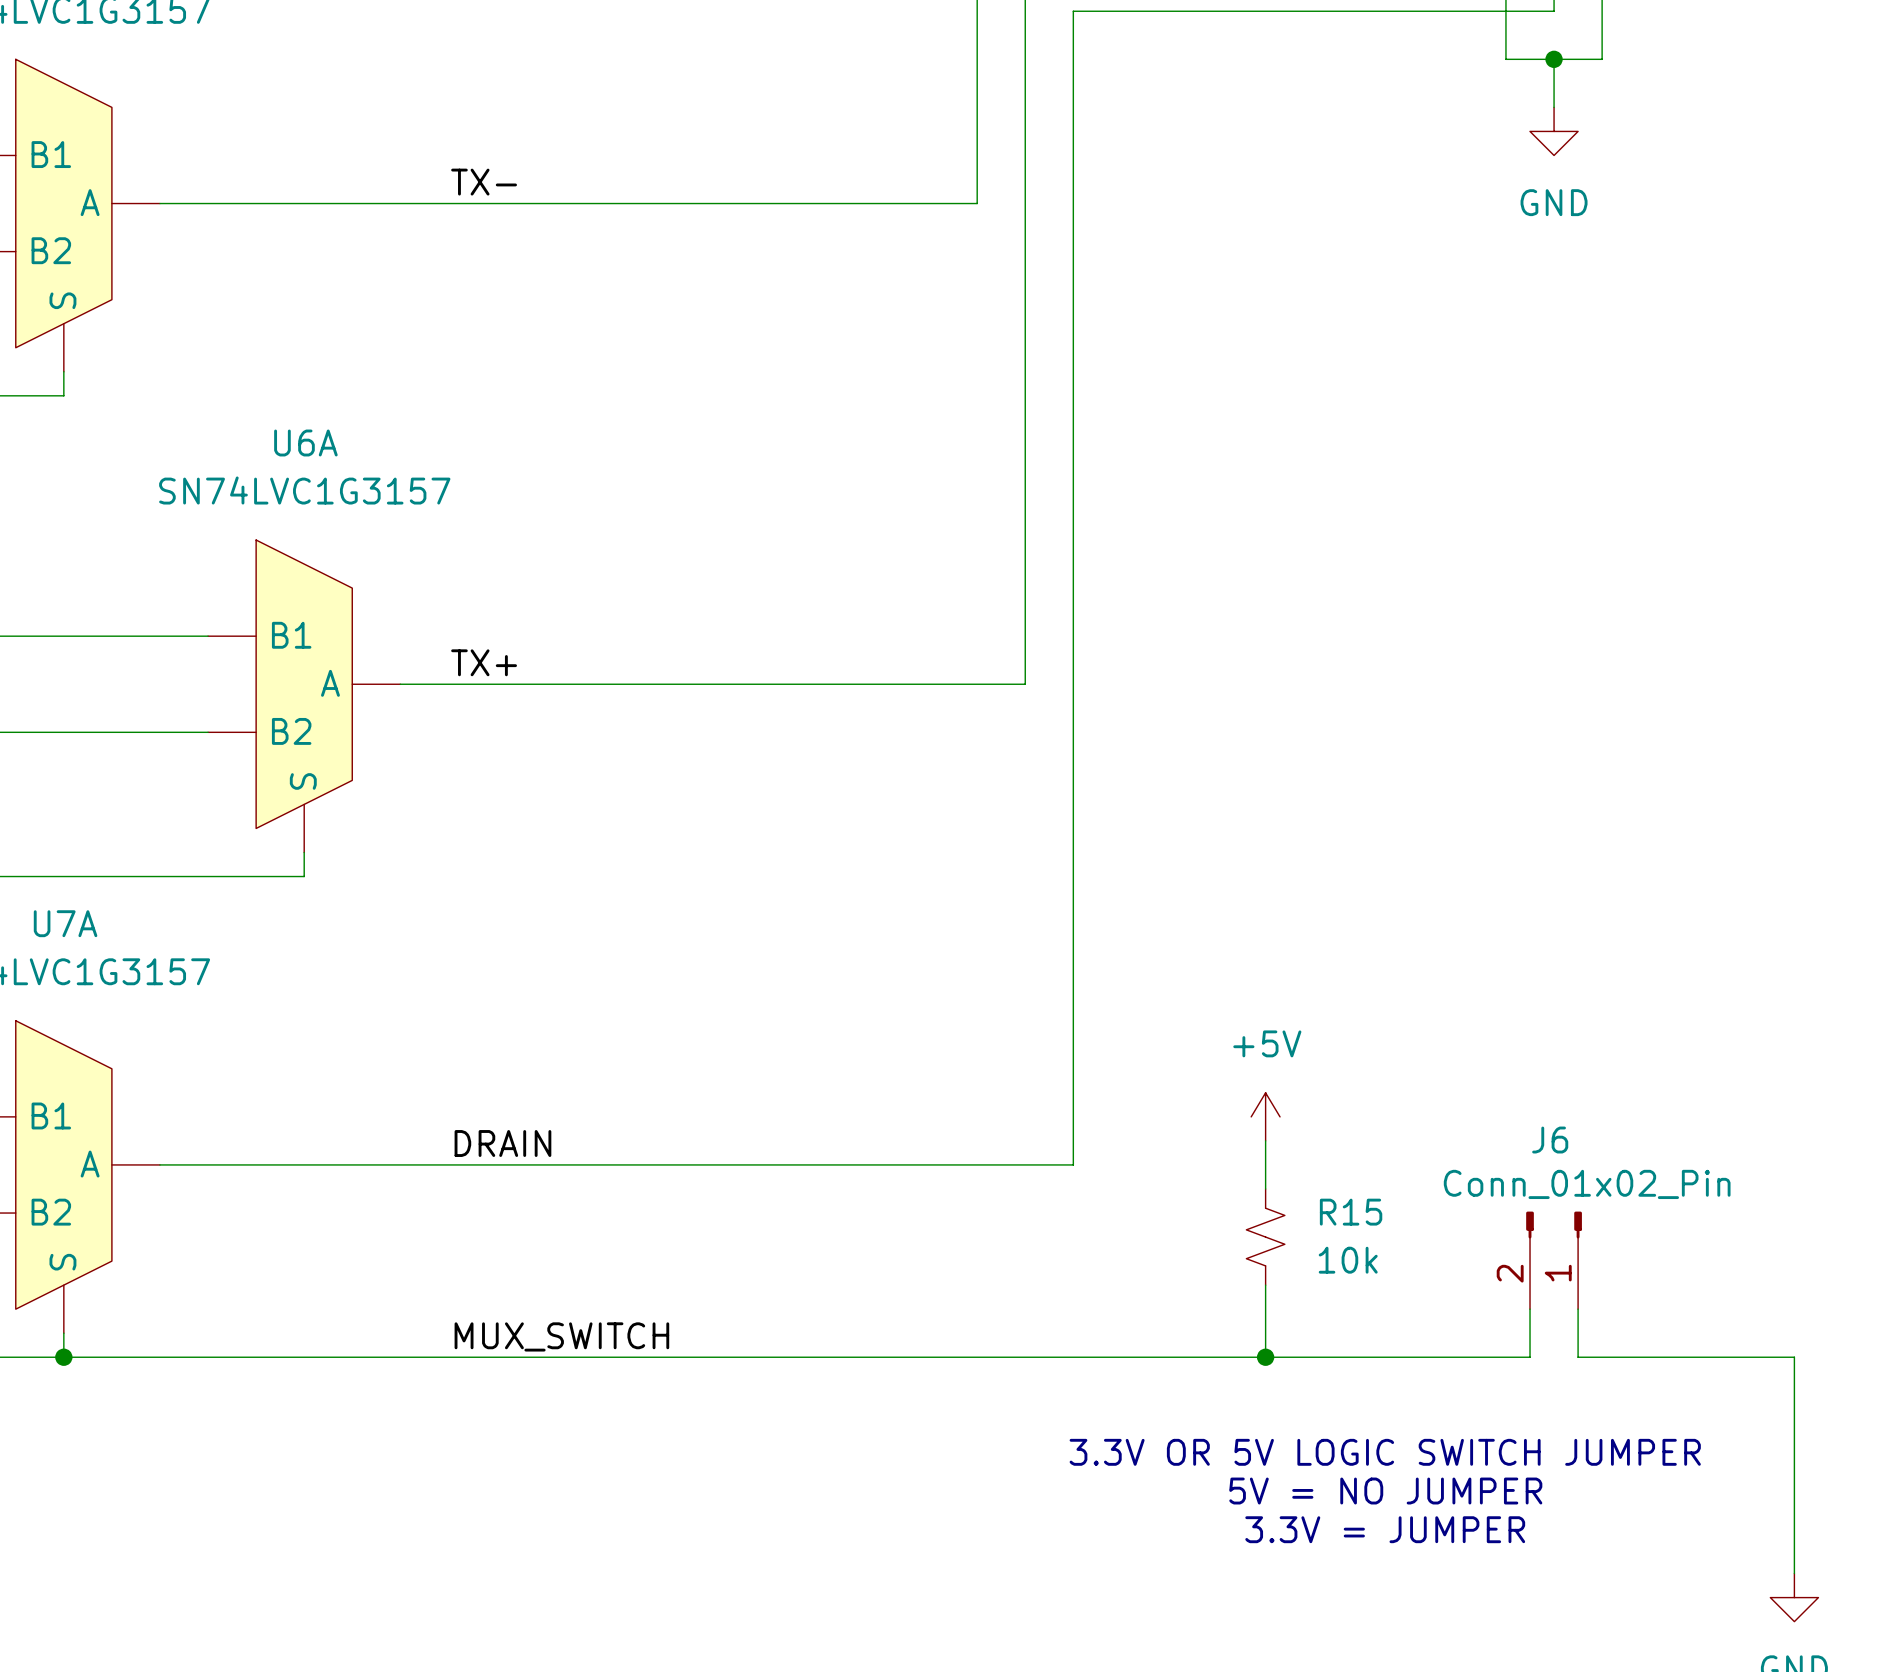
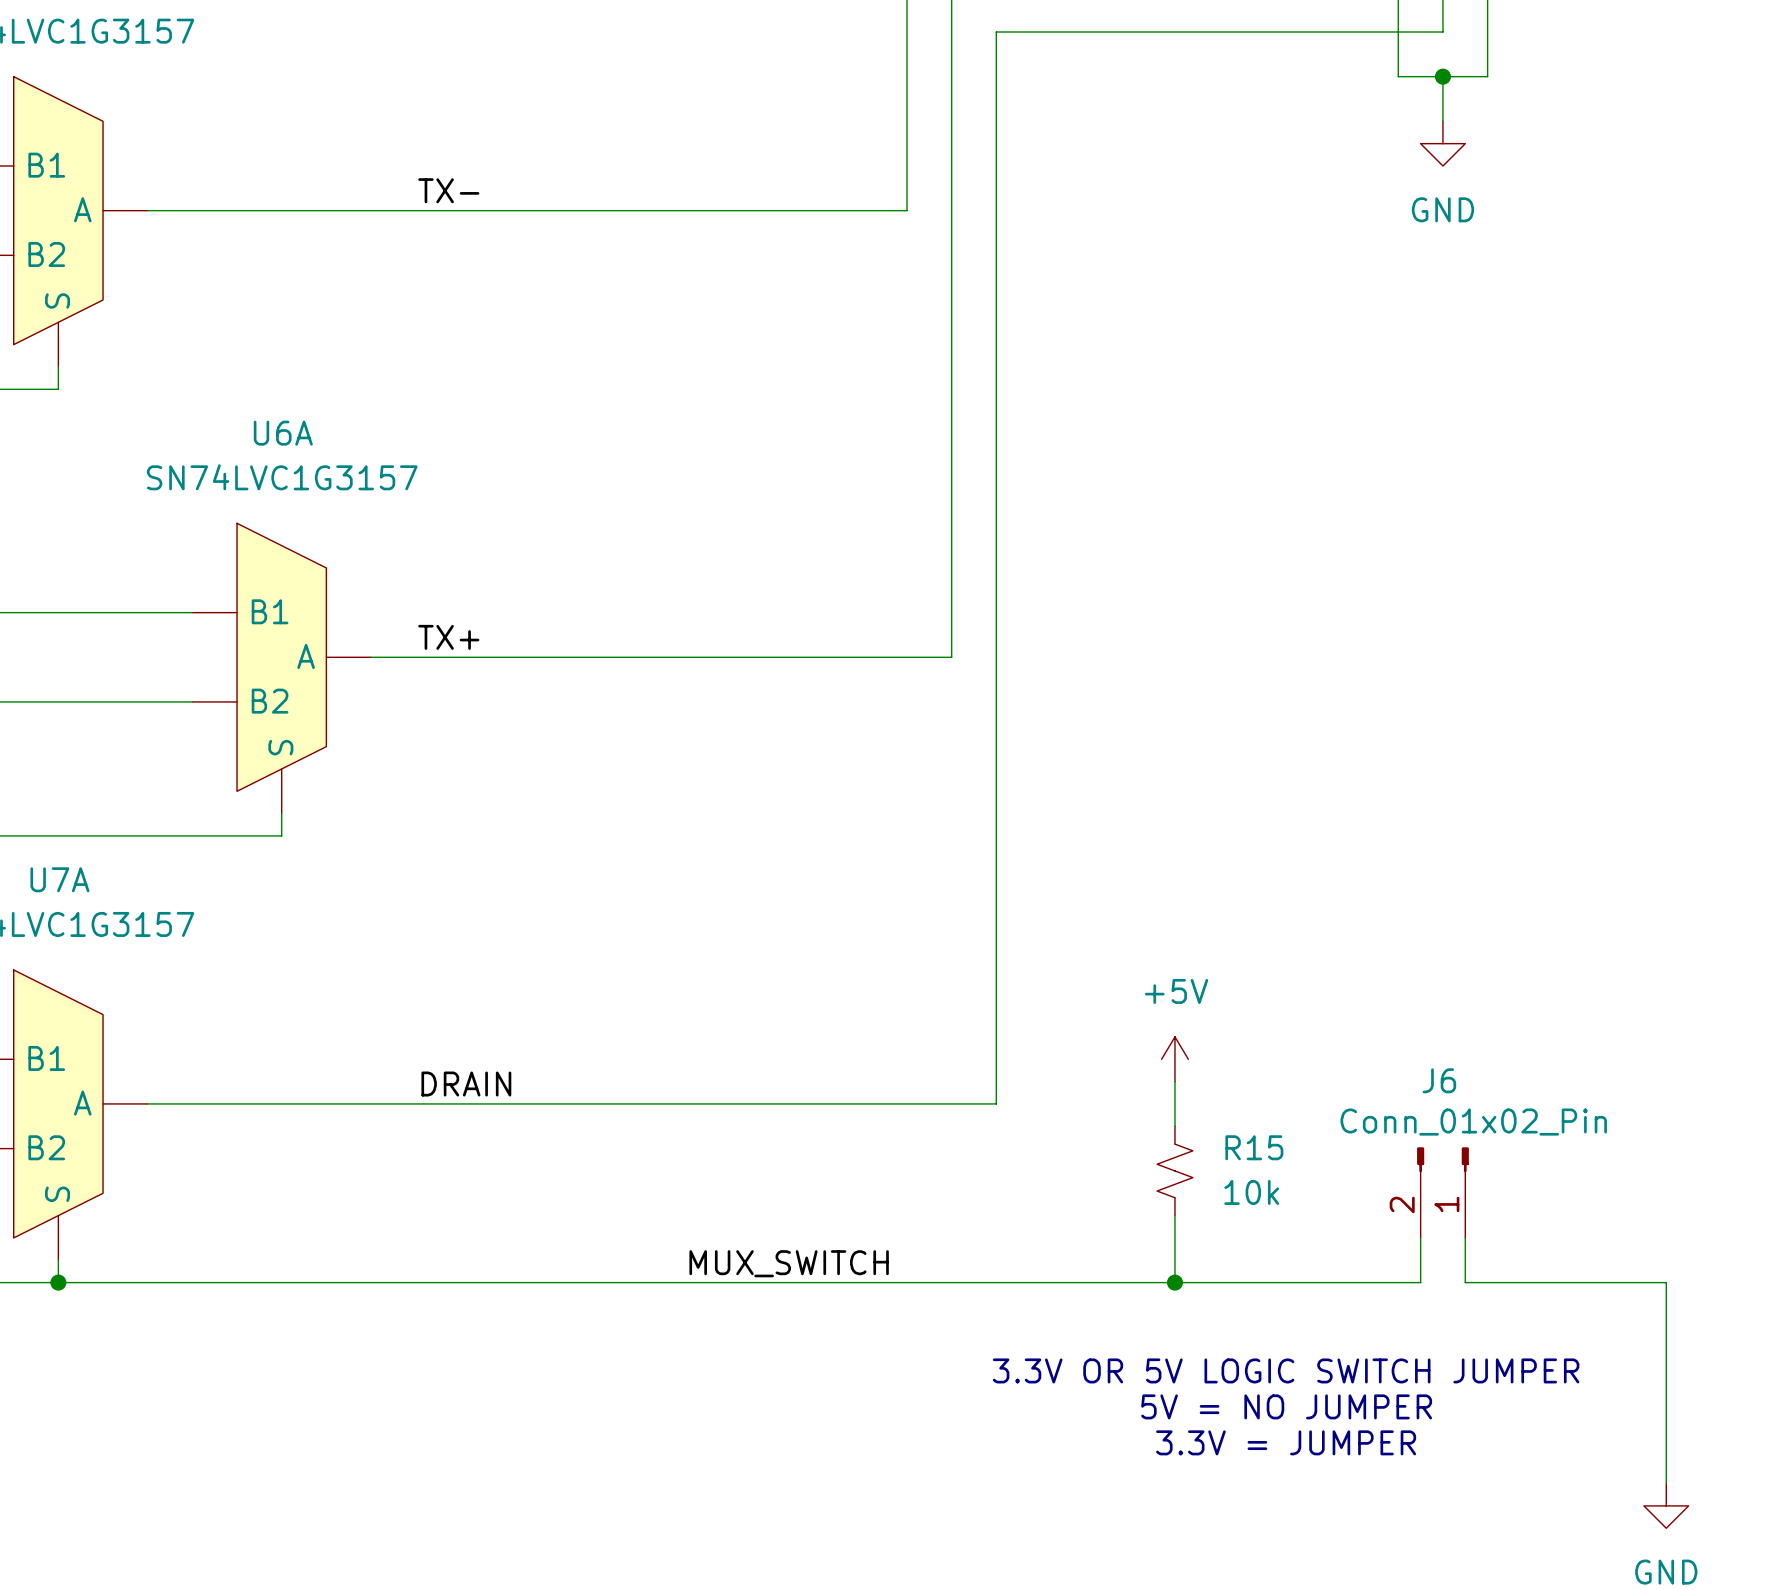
label position: MUX_SWITCH (561, 1336) -> MUX_SWITCH (789, 1263)

